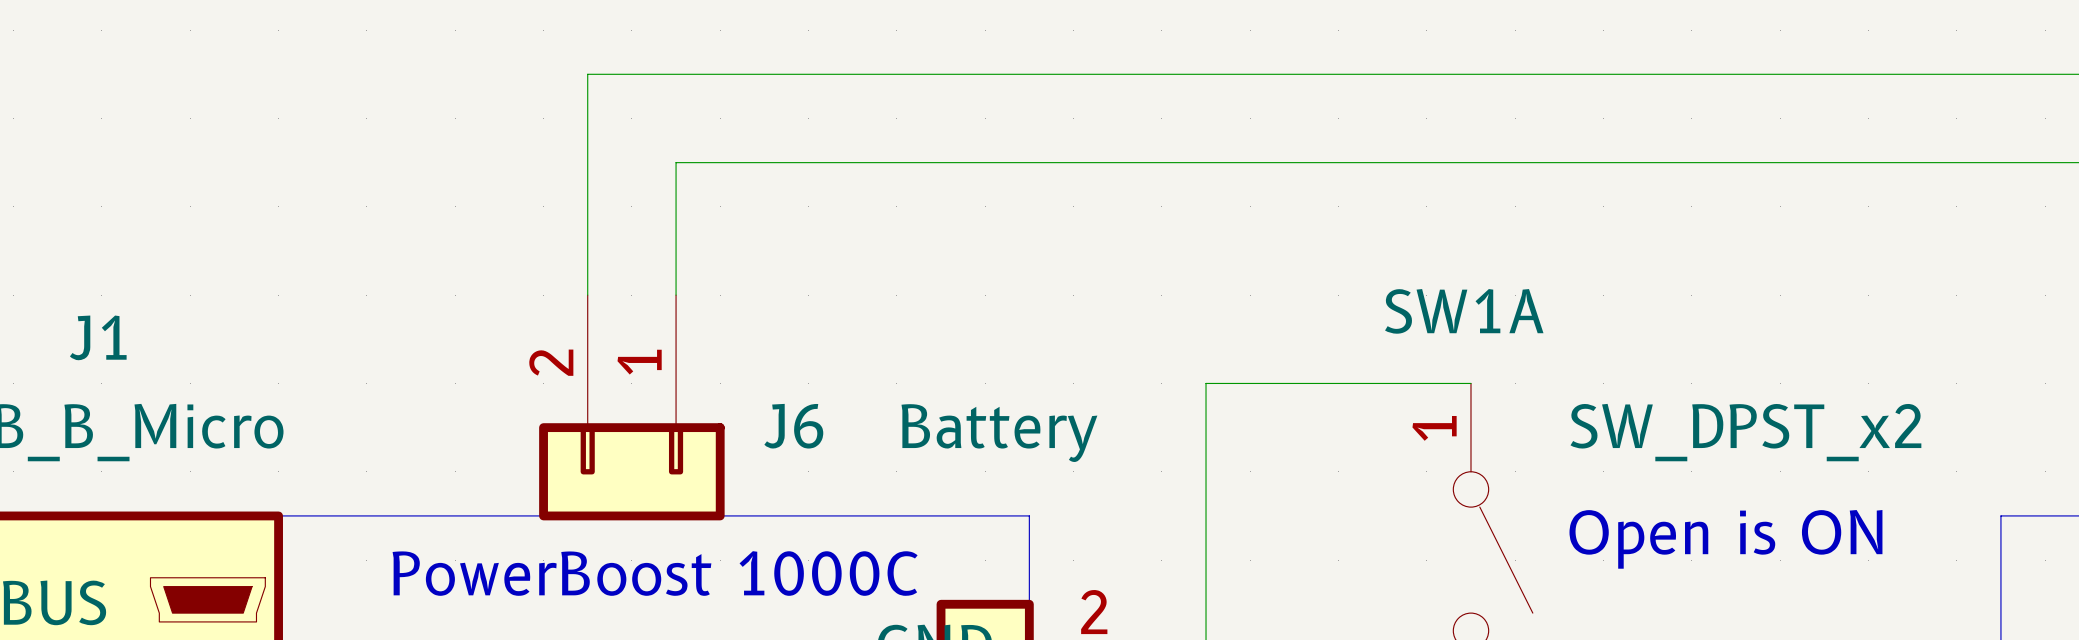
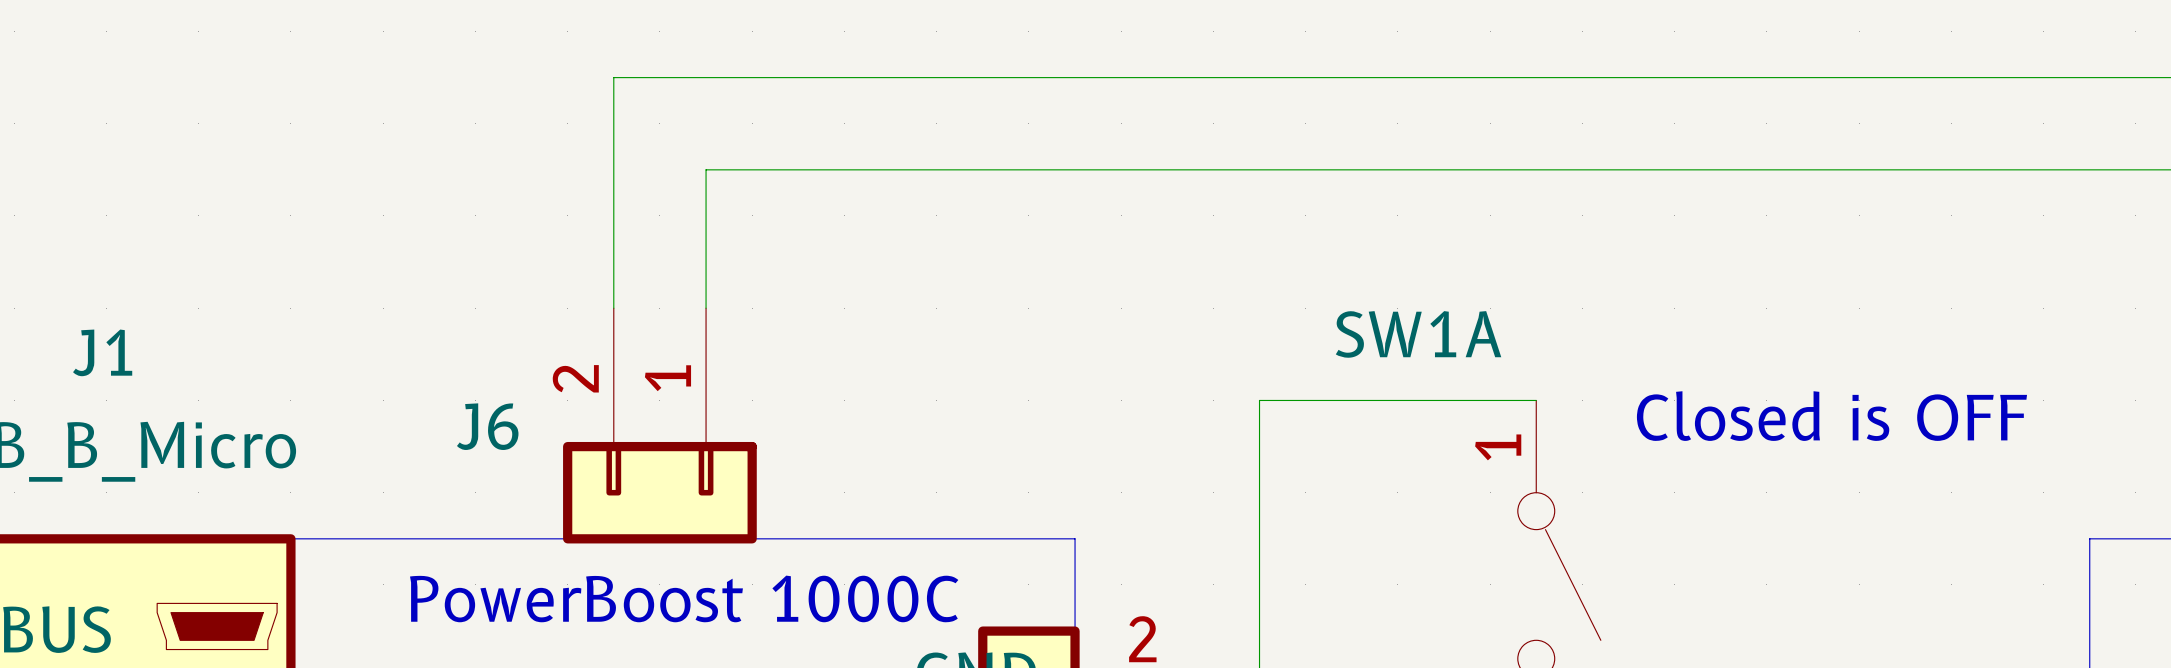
SW1A name position: SW1A (1464, 311) -> SW1A (1418, 334)
text: none -> Closed is OFF (1831, 416)
J6 name position: J6 (793, 426) -> J6 (487, 426)
SW1A value: SW_DPST_x2 (1745, 432) -> none
J6 value: Battery (999, 433) -> none
text: Open is ON (1725, 539) -> none

